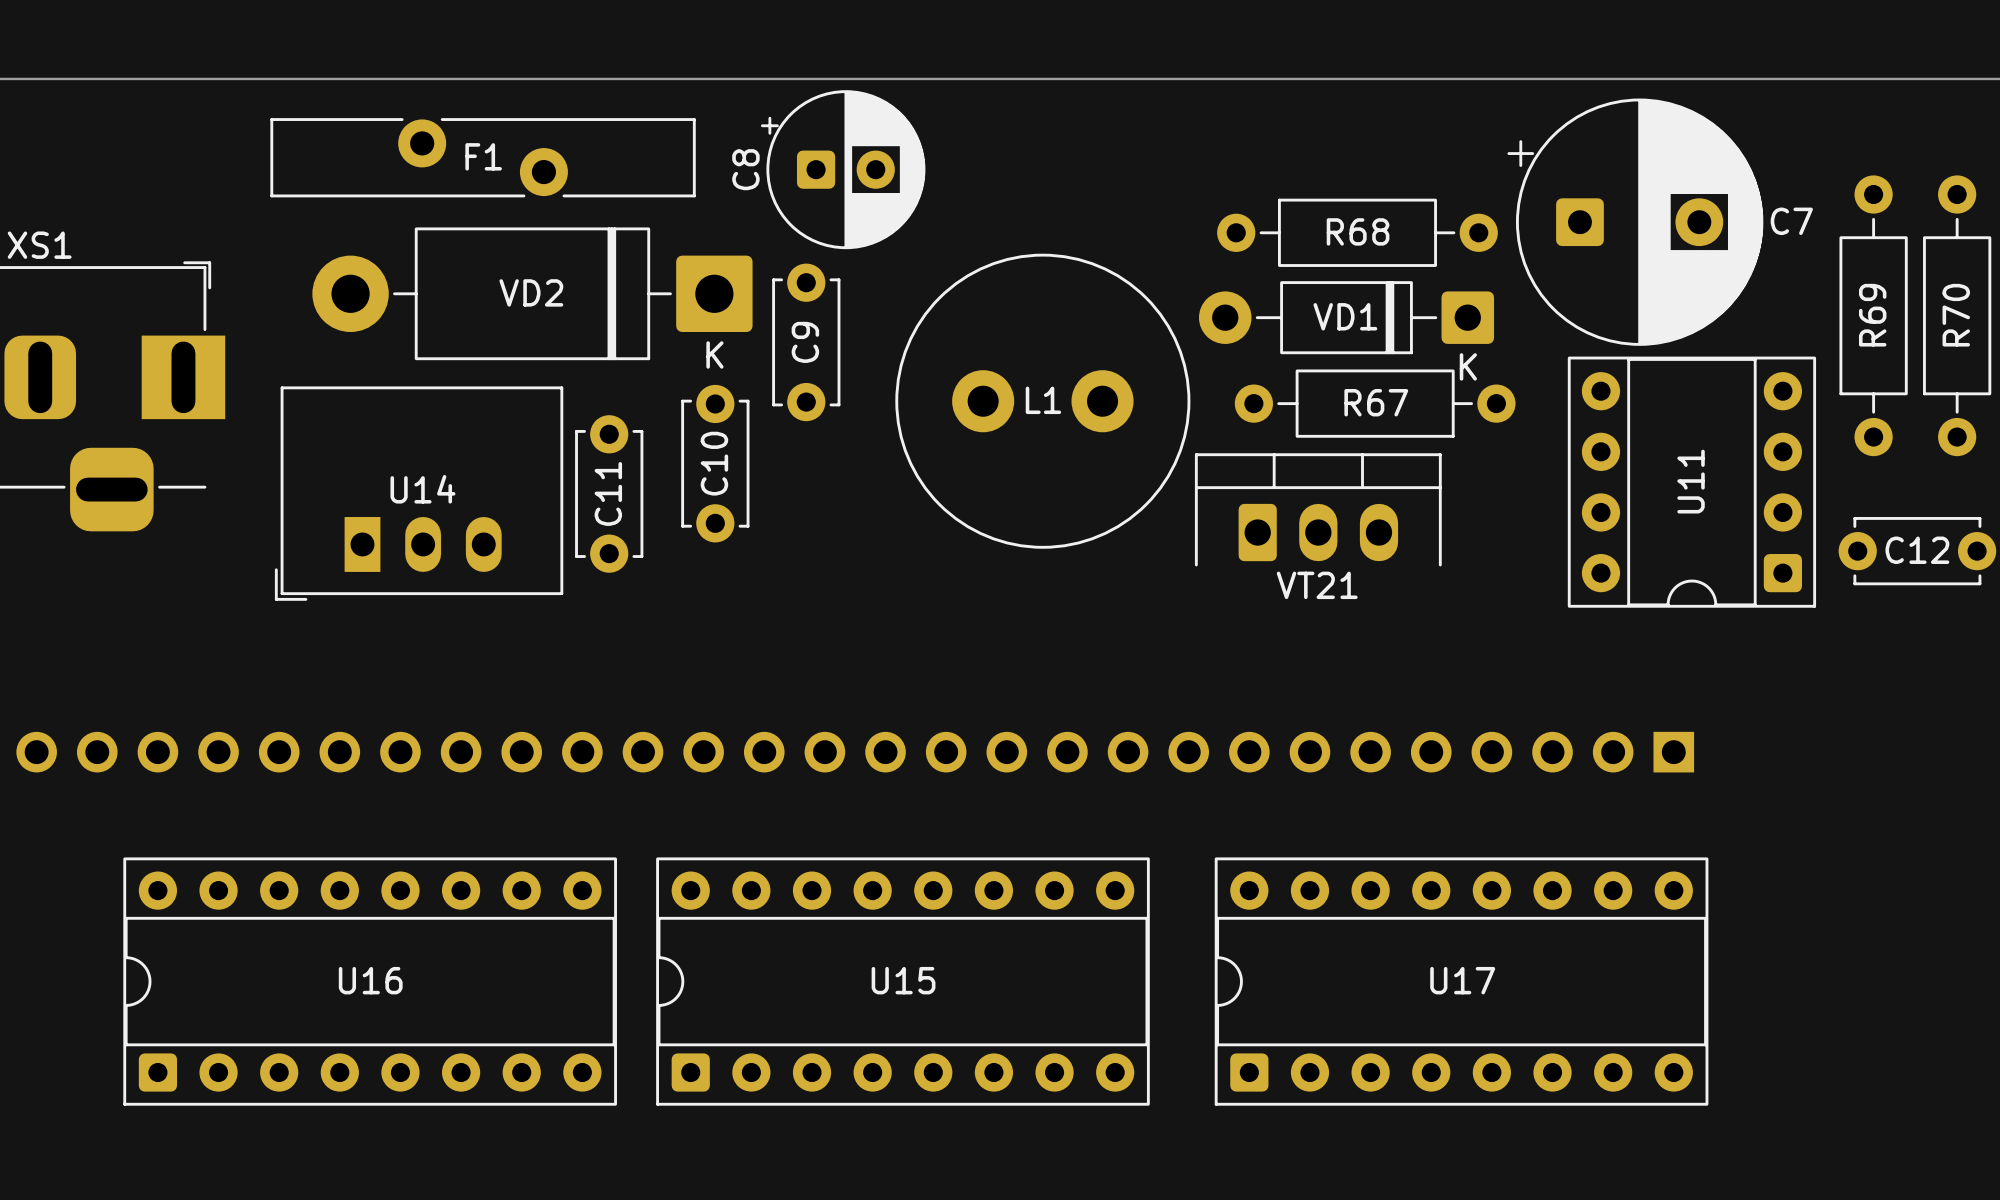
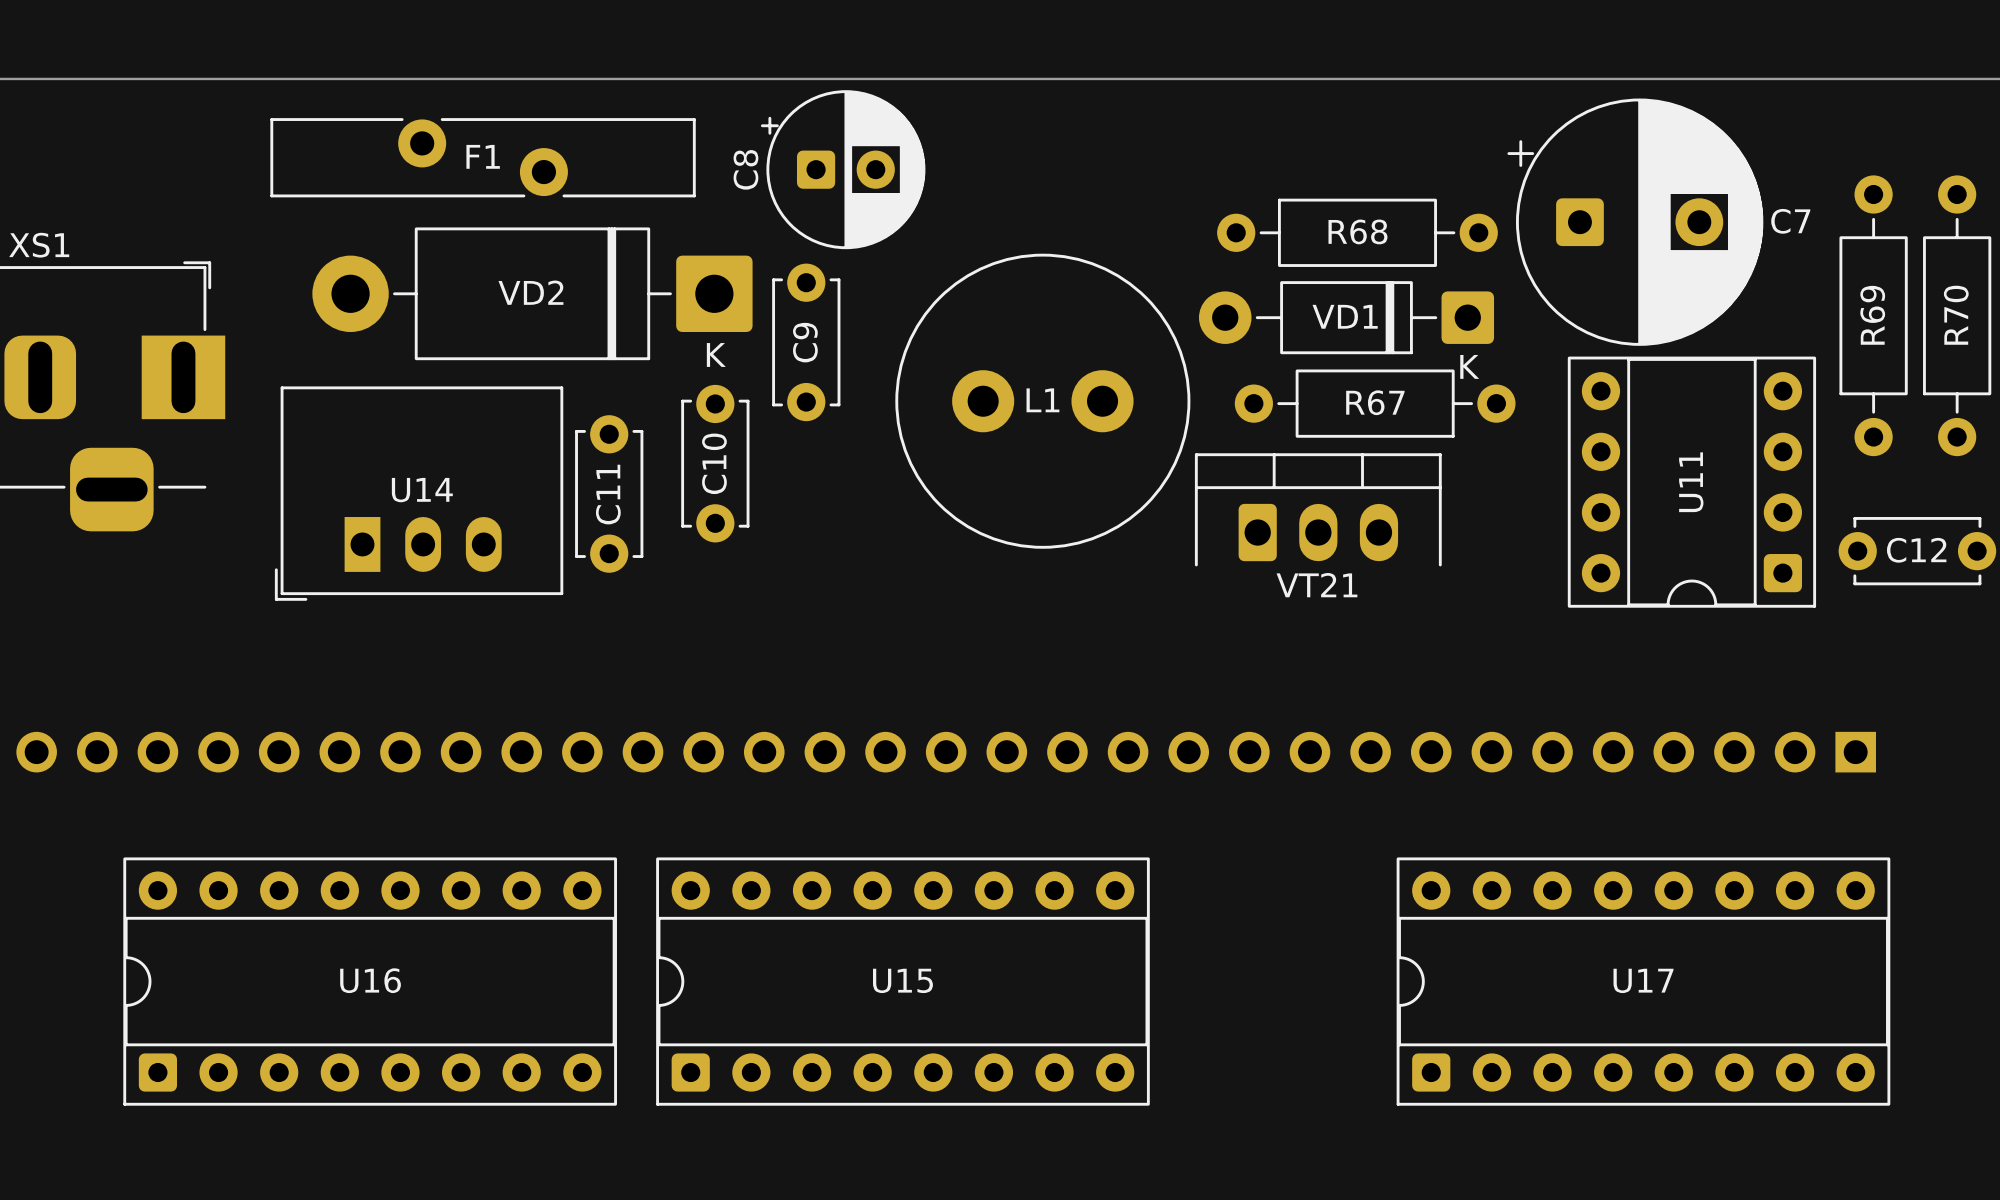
part: (855, 752) -> none
part: none -> (946, 752)
U17 position: (1461, 981) -> (1643, 981)

